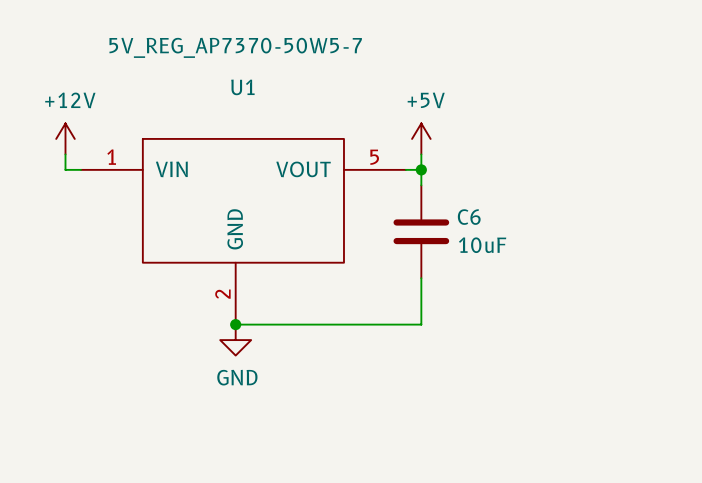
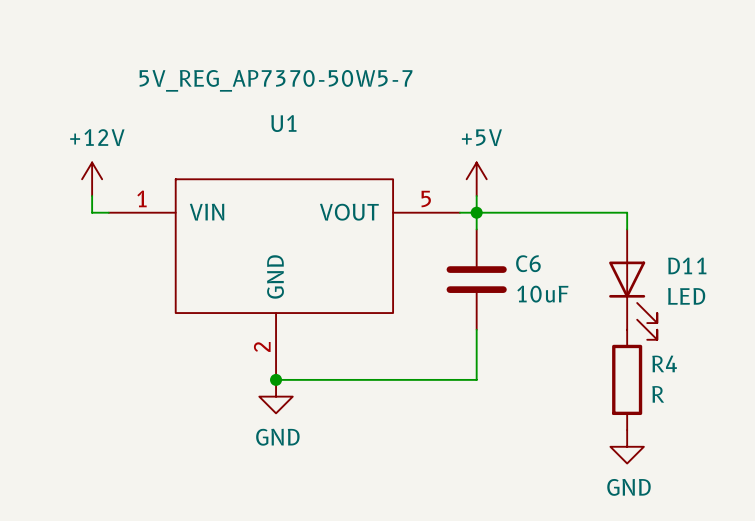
wire: none -> (476, 212) (627, 212) (627, 229)
D11: none -> LED (633, 284)
R4: none -> R (627, 379)
power symbol: none -> GND (627, 446)

